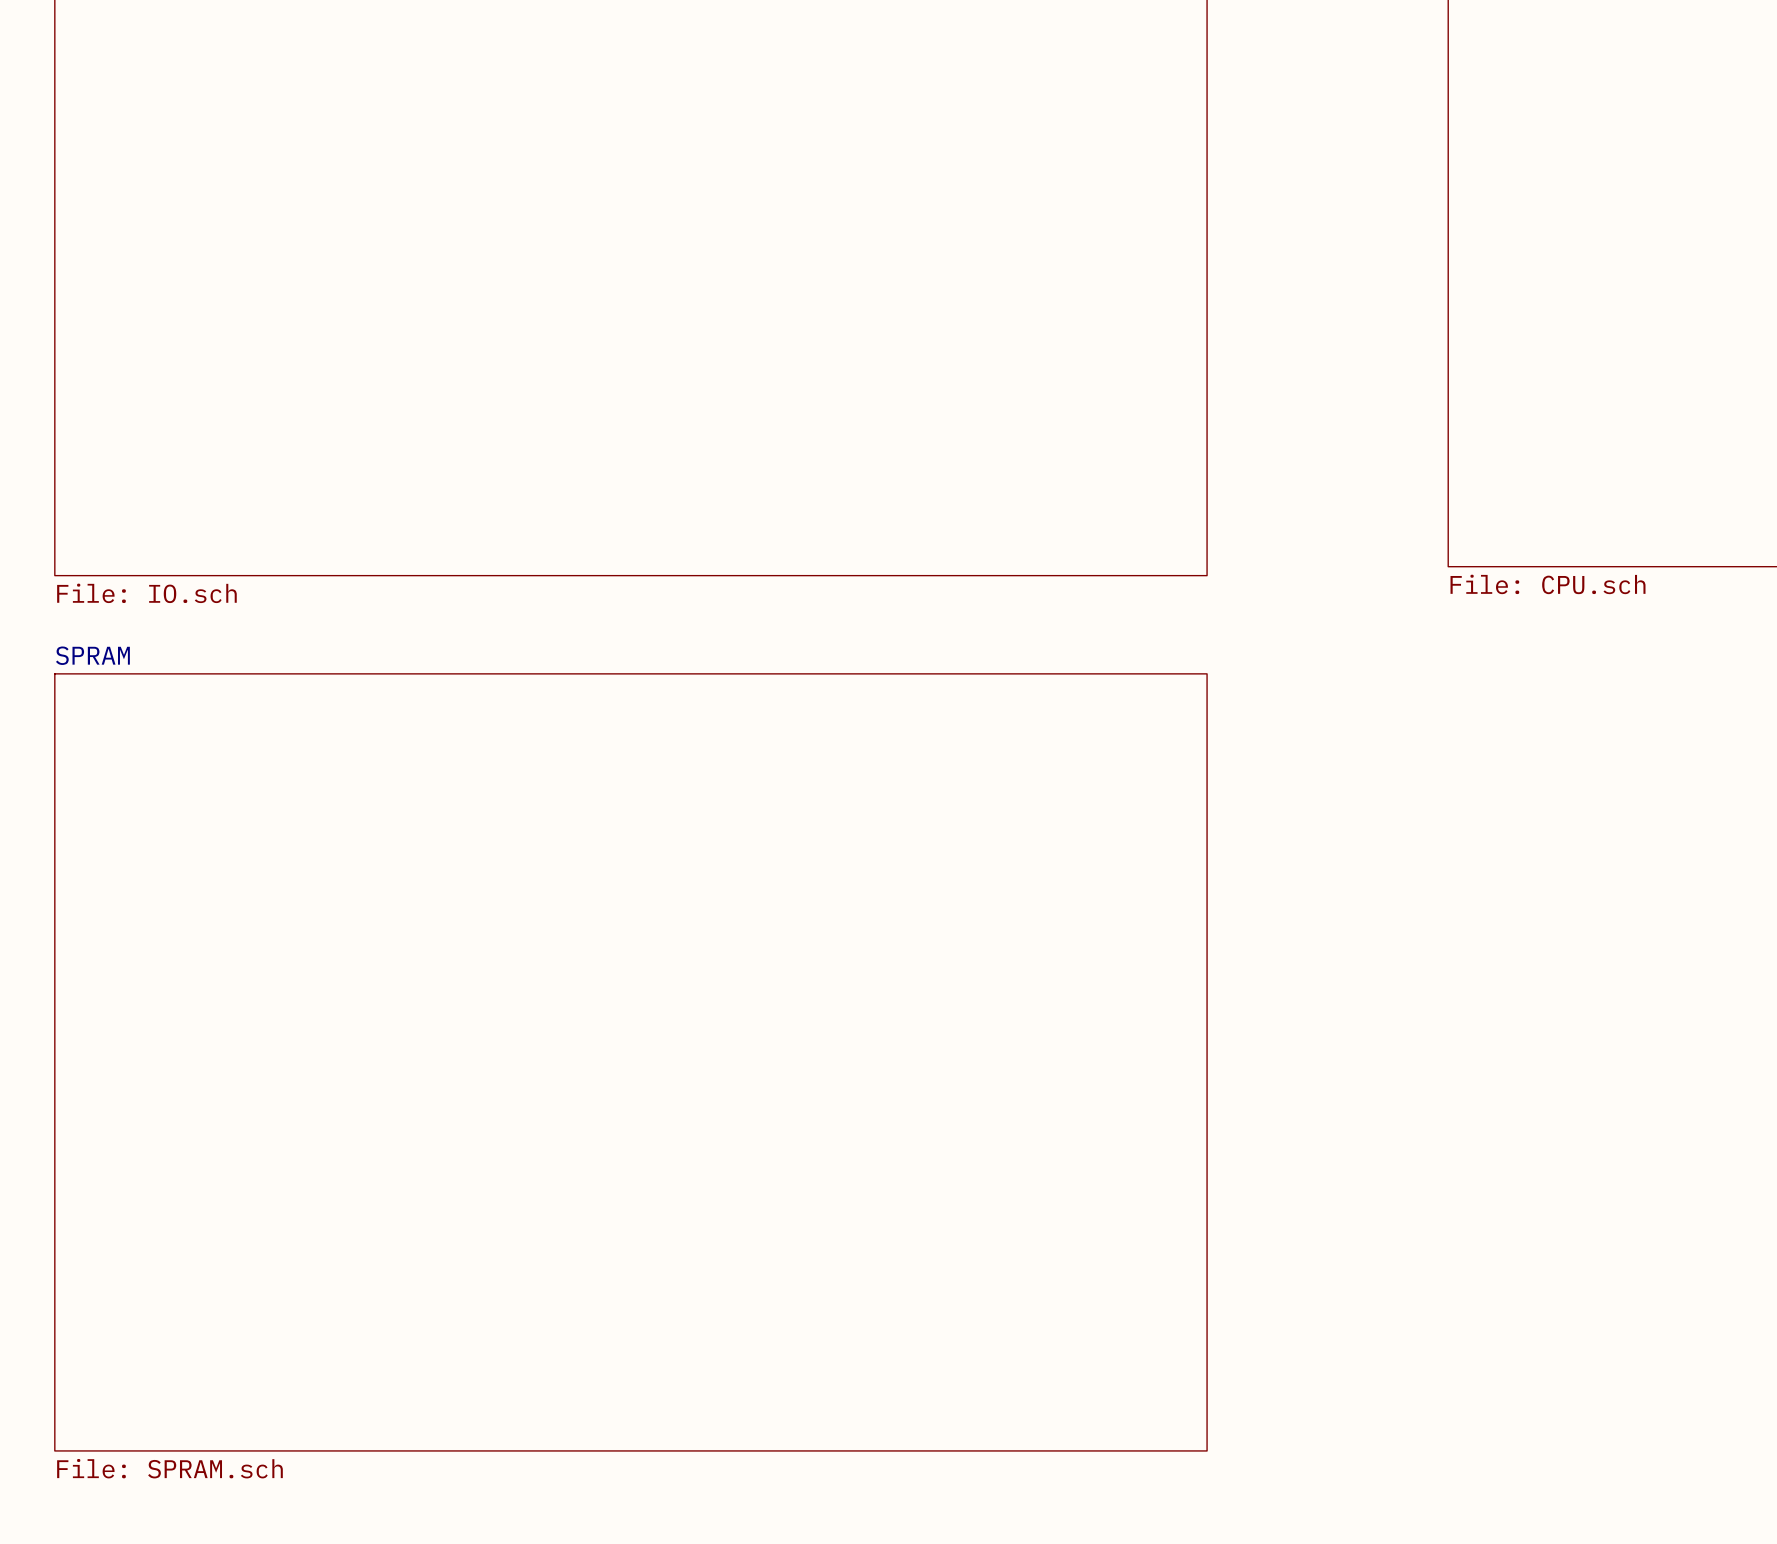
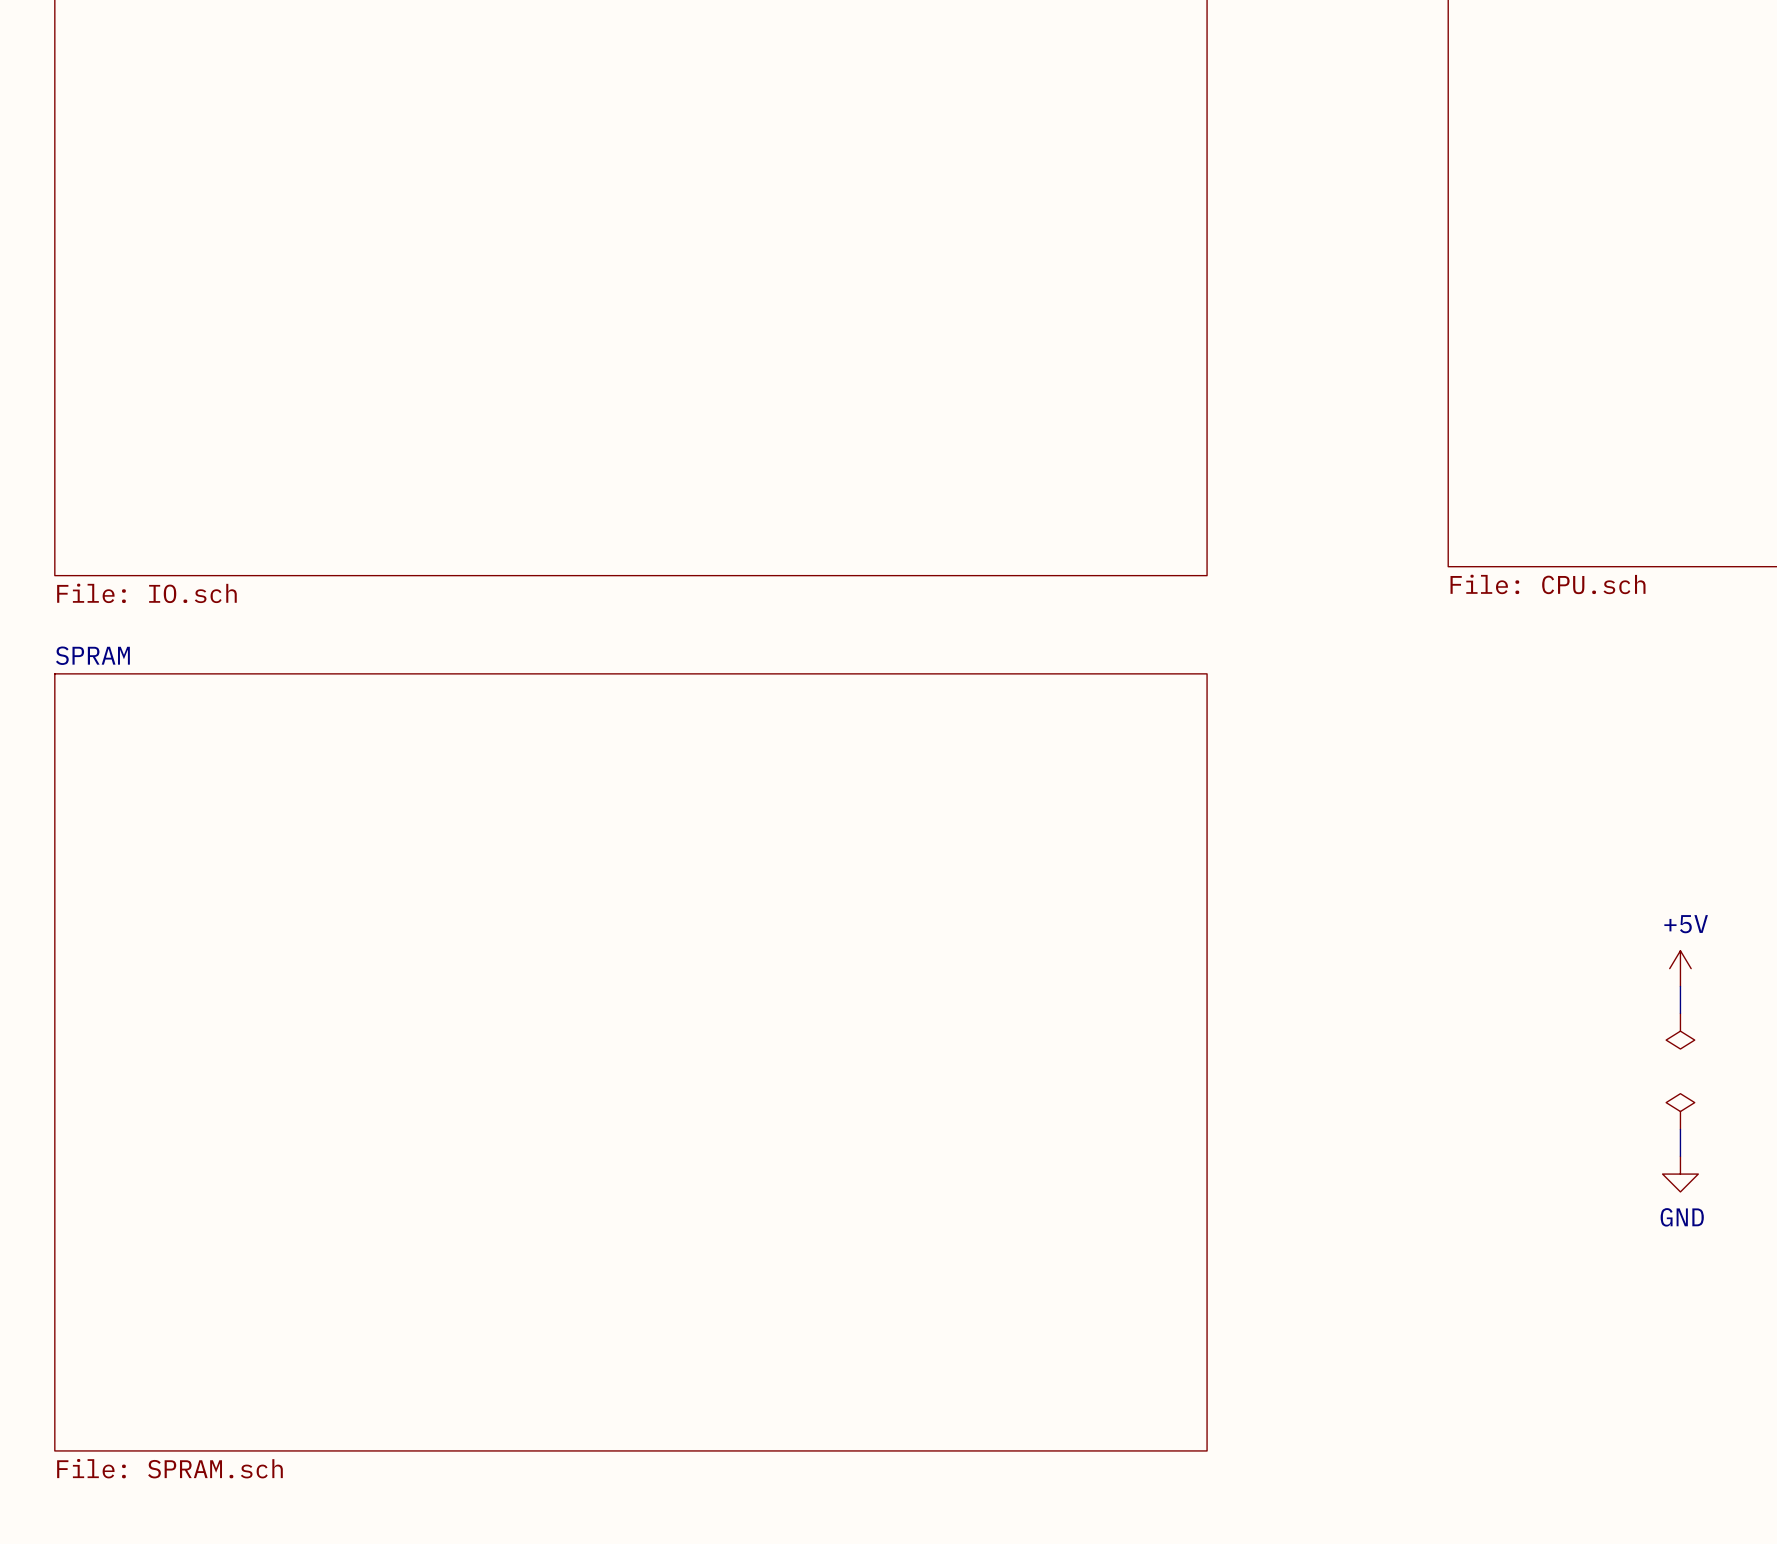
power symbol: none -> +5V (1680, 968)
wire: none -> (1680, 986) (1680, 1013)
power symbol: none -> (1680, 1031)
power symbol: none -> (1680, 1111)
wire: none -> (1680, 1129) (1680, 1156)
power symbol: none -> GND (1680, 1174)

